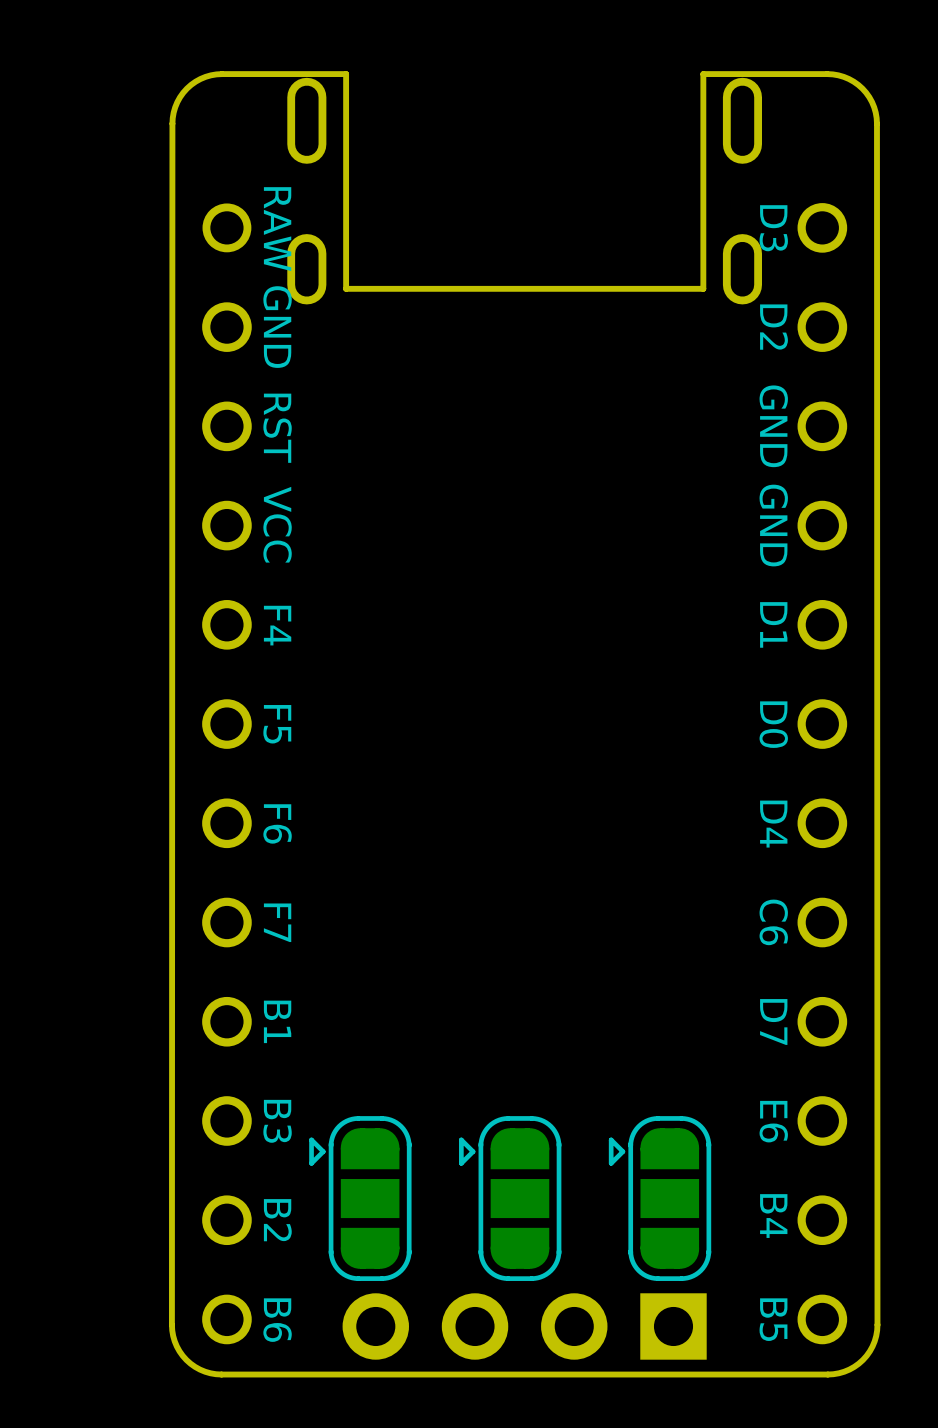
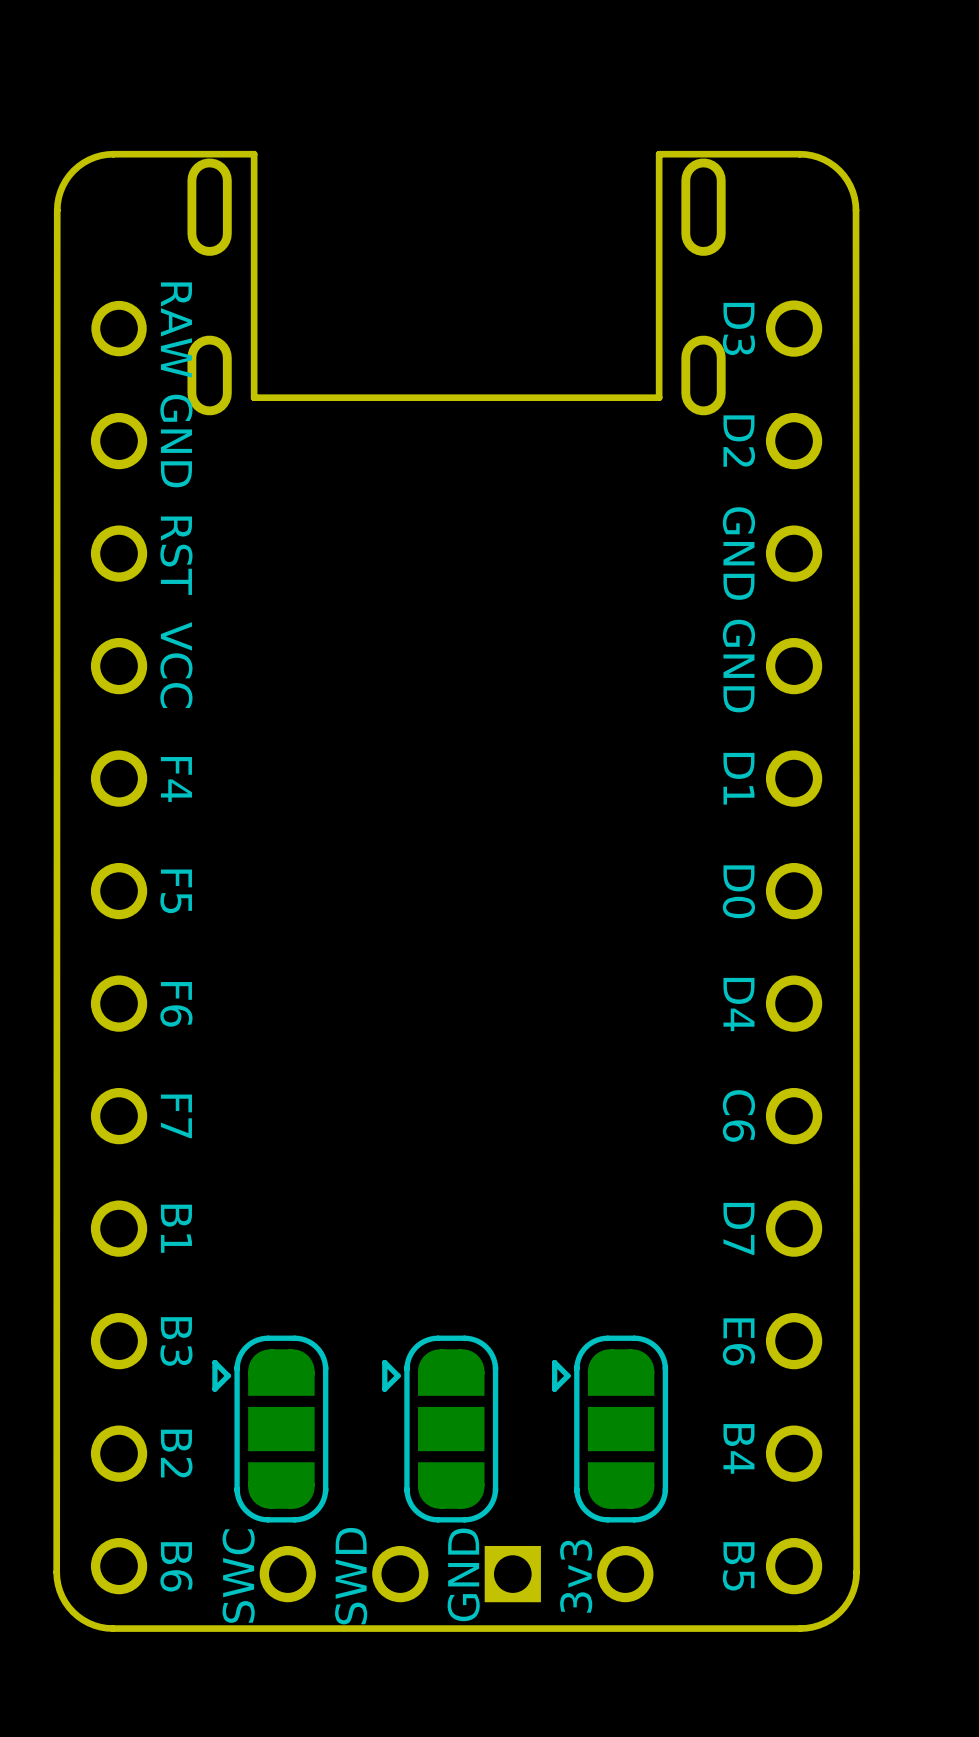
part footprint: [342, 1293, 707, 1360] -> [259, 1545, 654, 1603]

